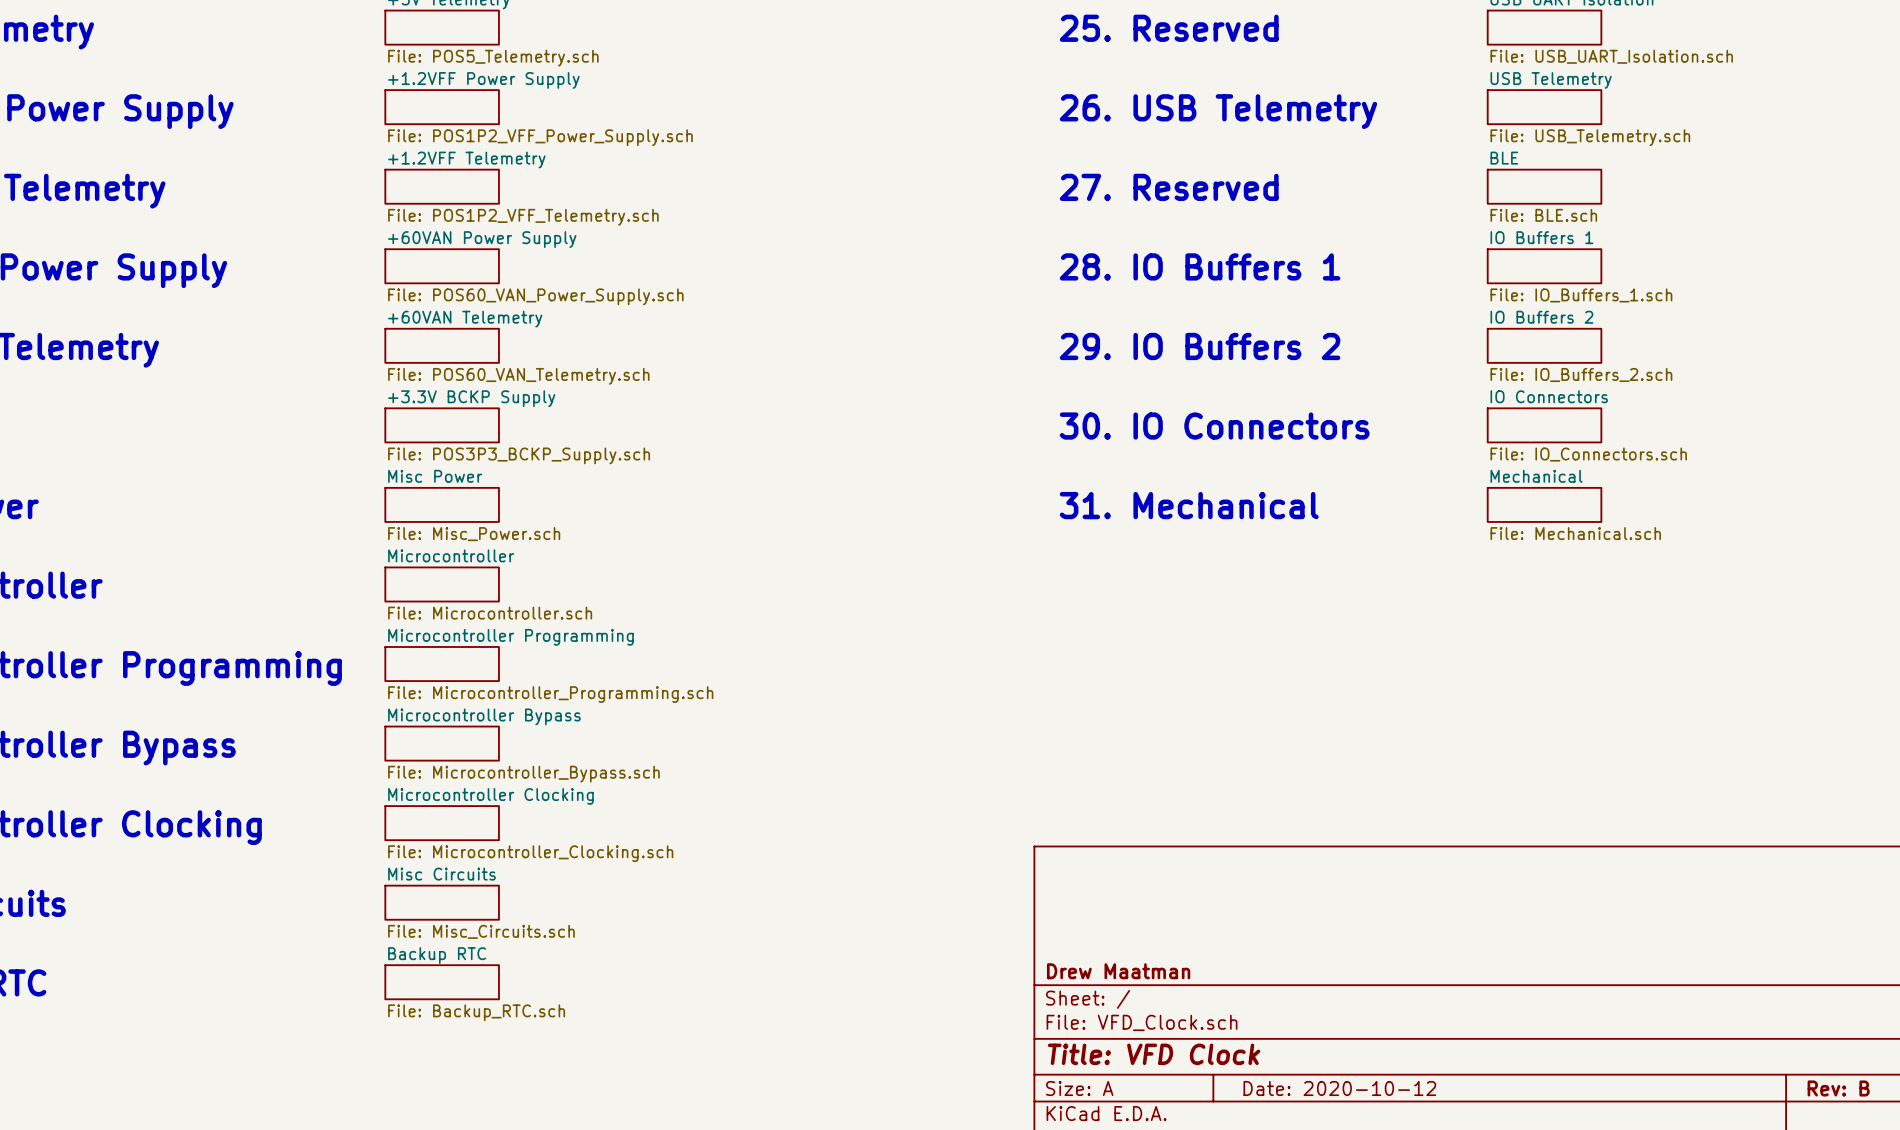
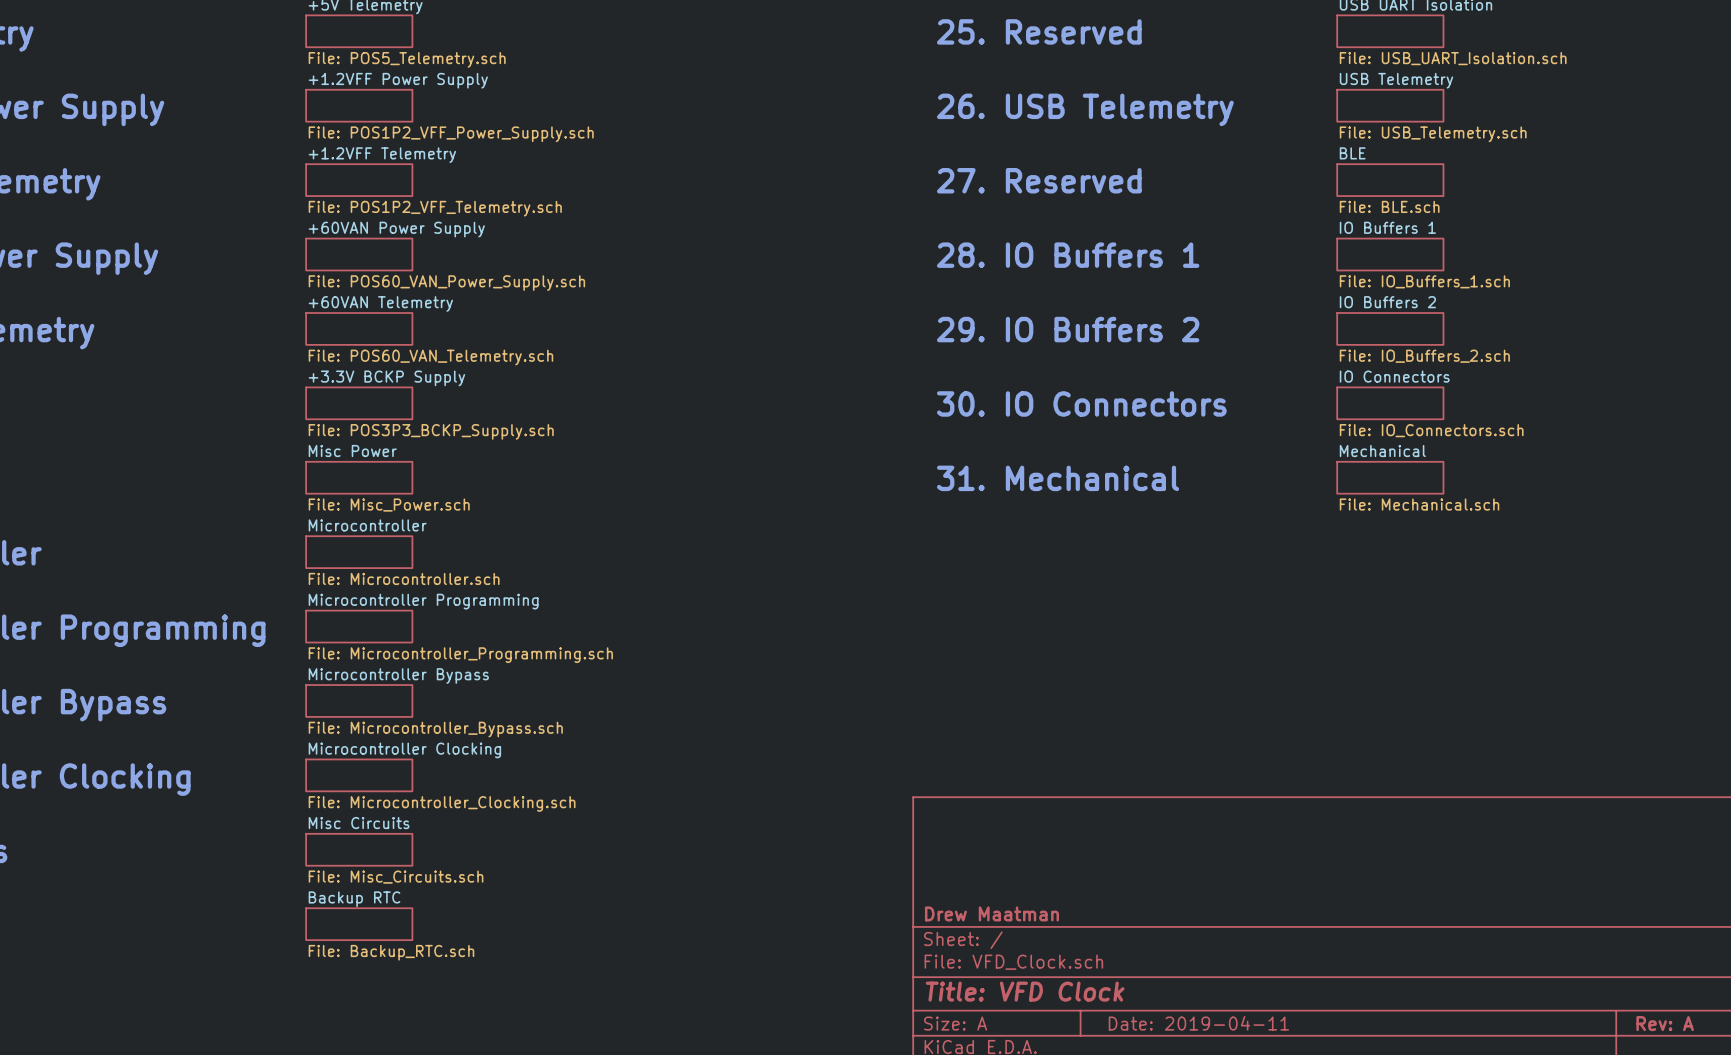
title block: Date: 2020-10-12 (1339, 1088) -> Date: 2019-04-11 (1198, 1023)
title block: Rev: B (1838, 1088) -> Rev: A (1665, 1023)

